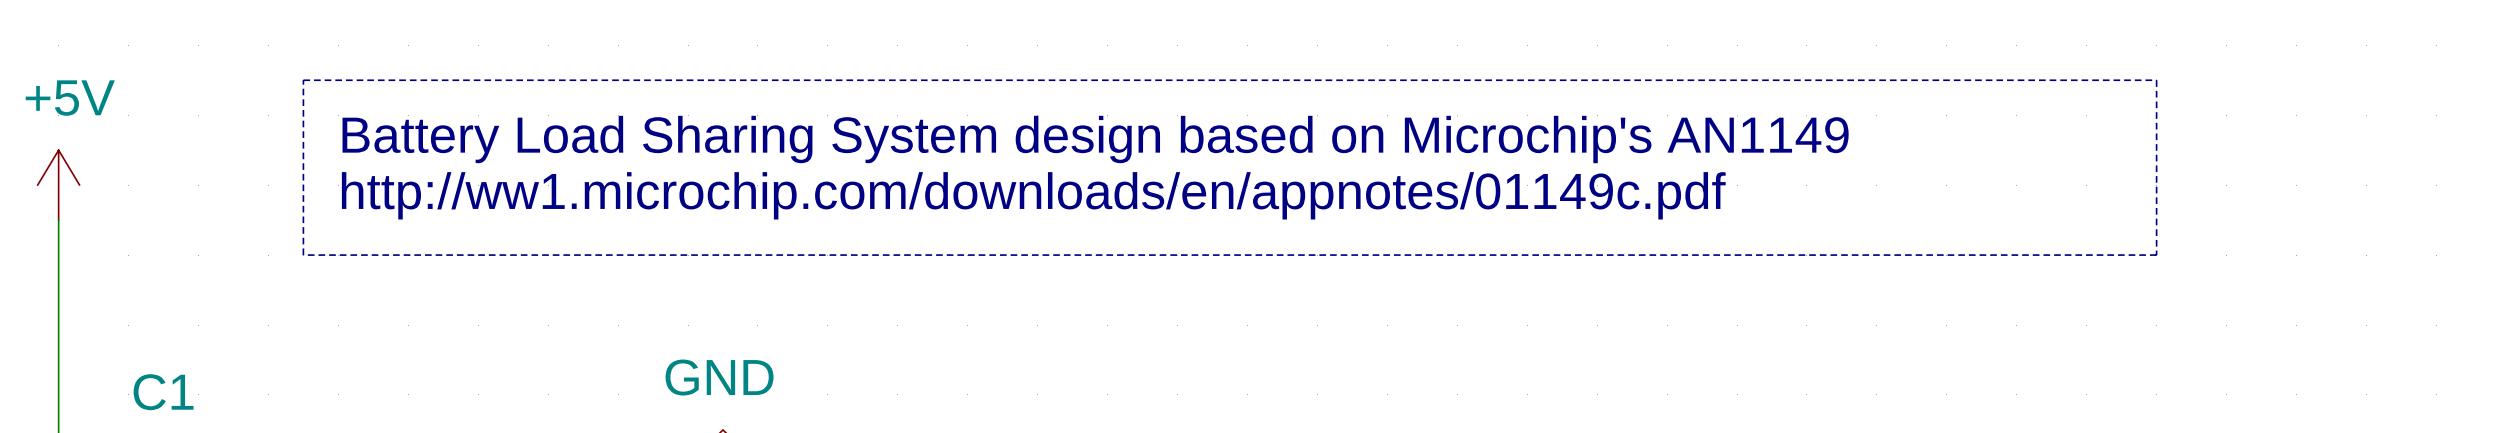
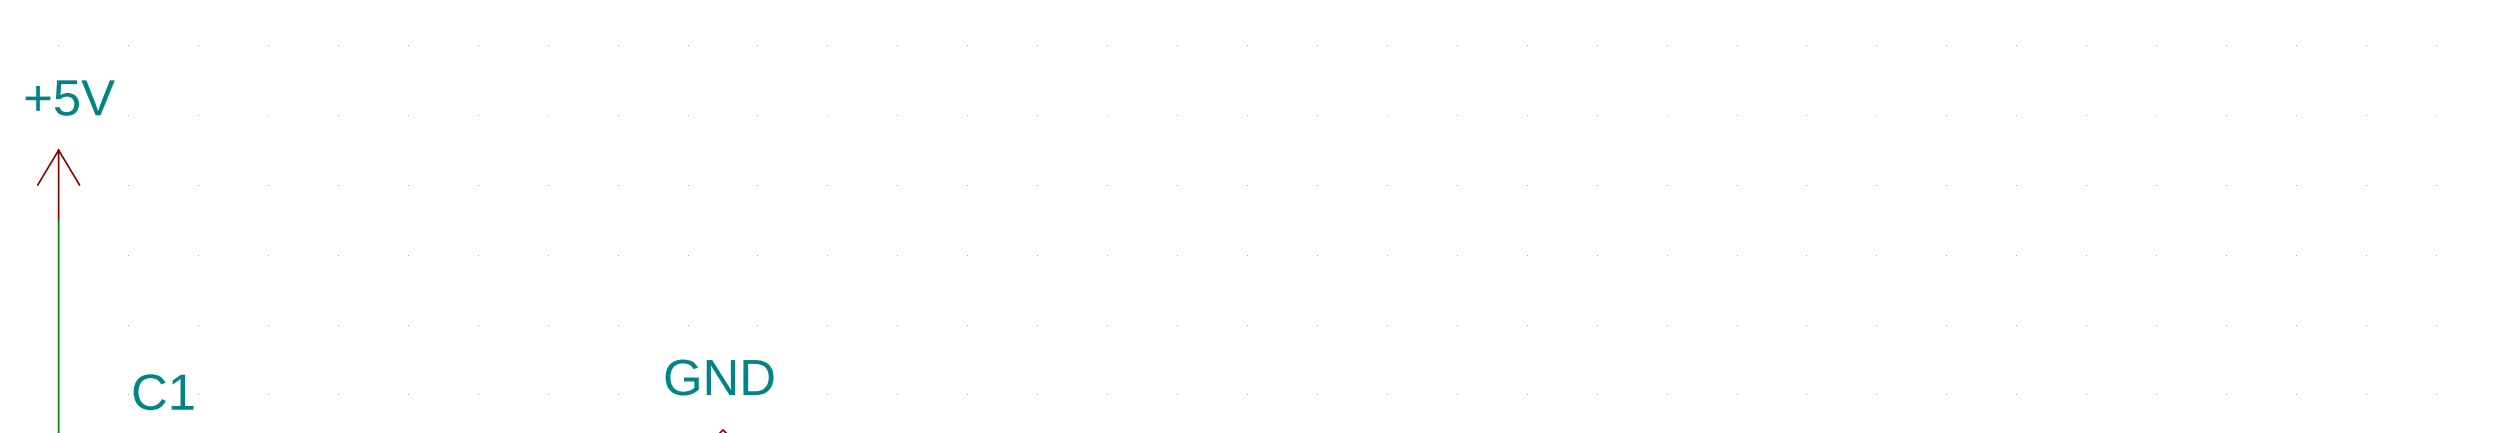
line: (303, 80) (2156, 80) (2156, 255) (303, 255) (303, 80) -> none
text: Battery Load Sharing System design based on Microchip's AN1149 (1095, 139) -> none
text: http://ww1.microchip.com/downloads/en/appnotes/01149c.pdf (1033, 195) -> none

